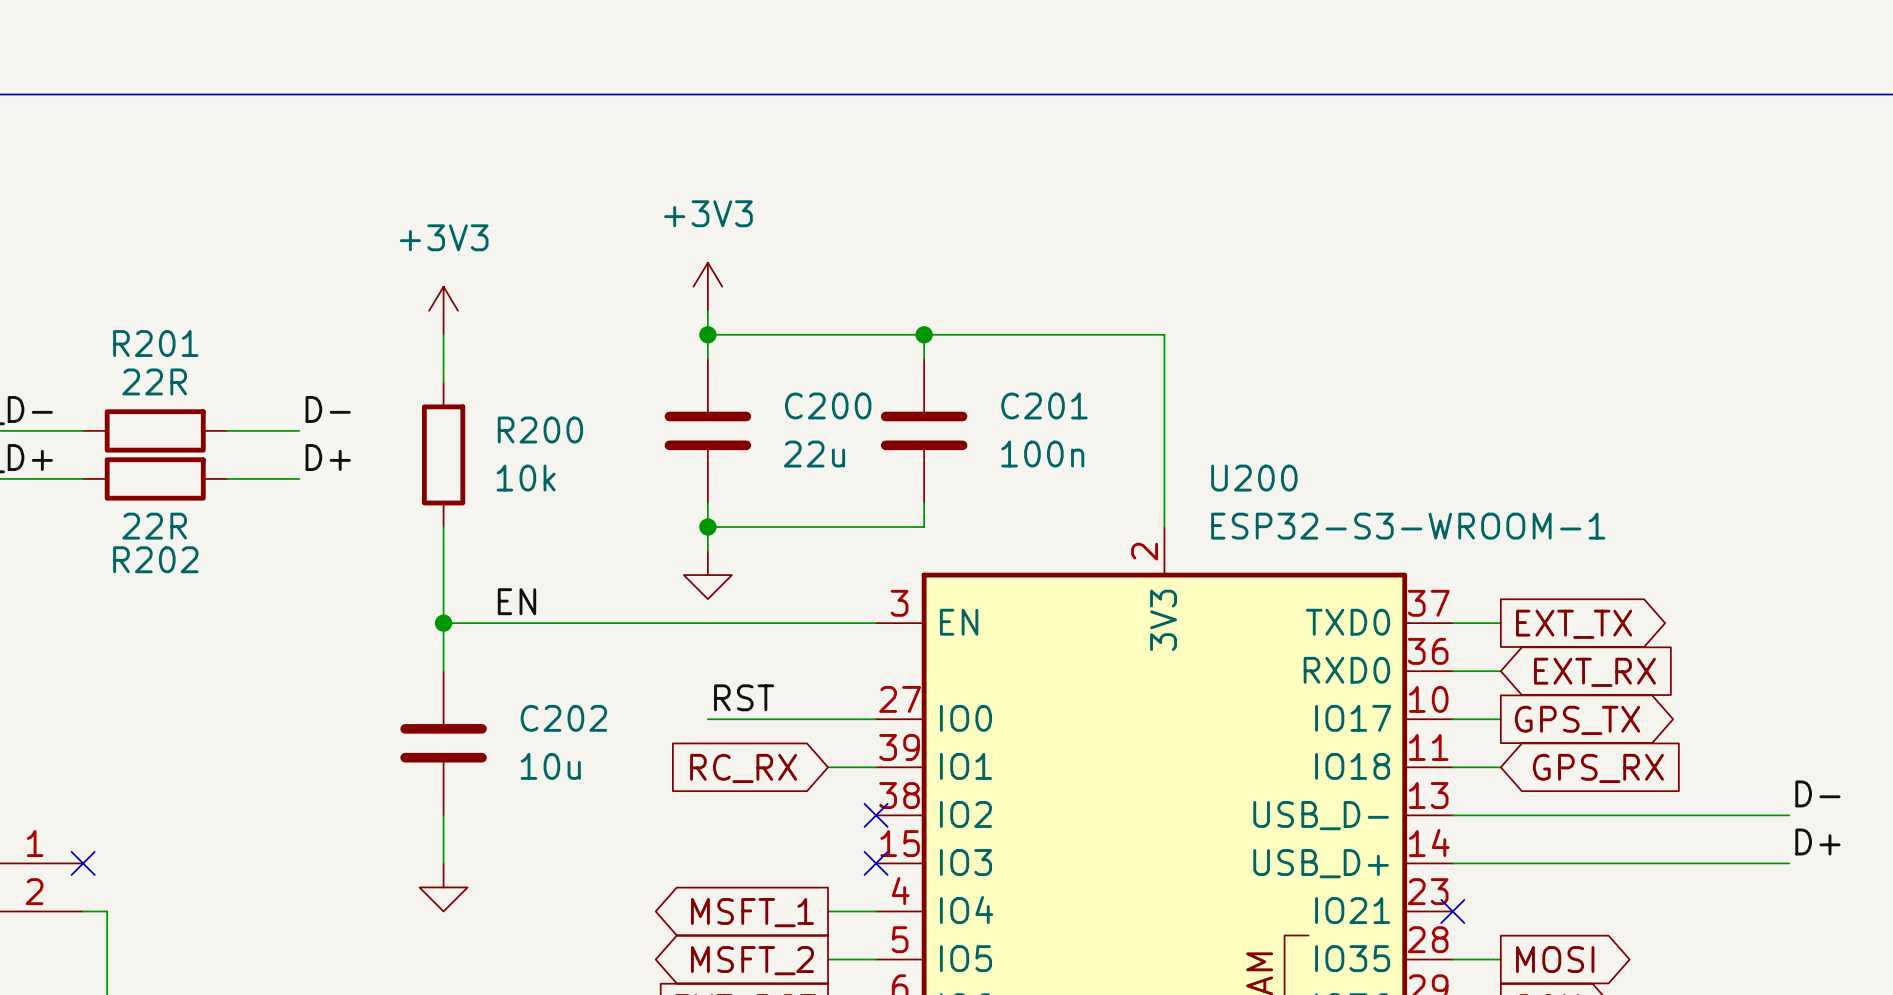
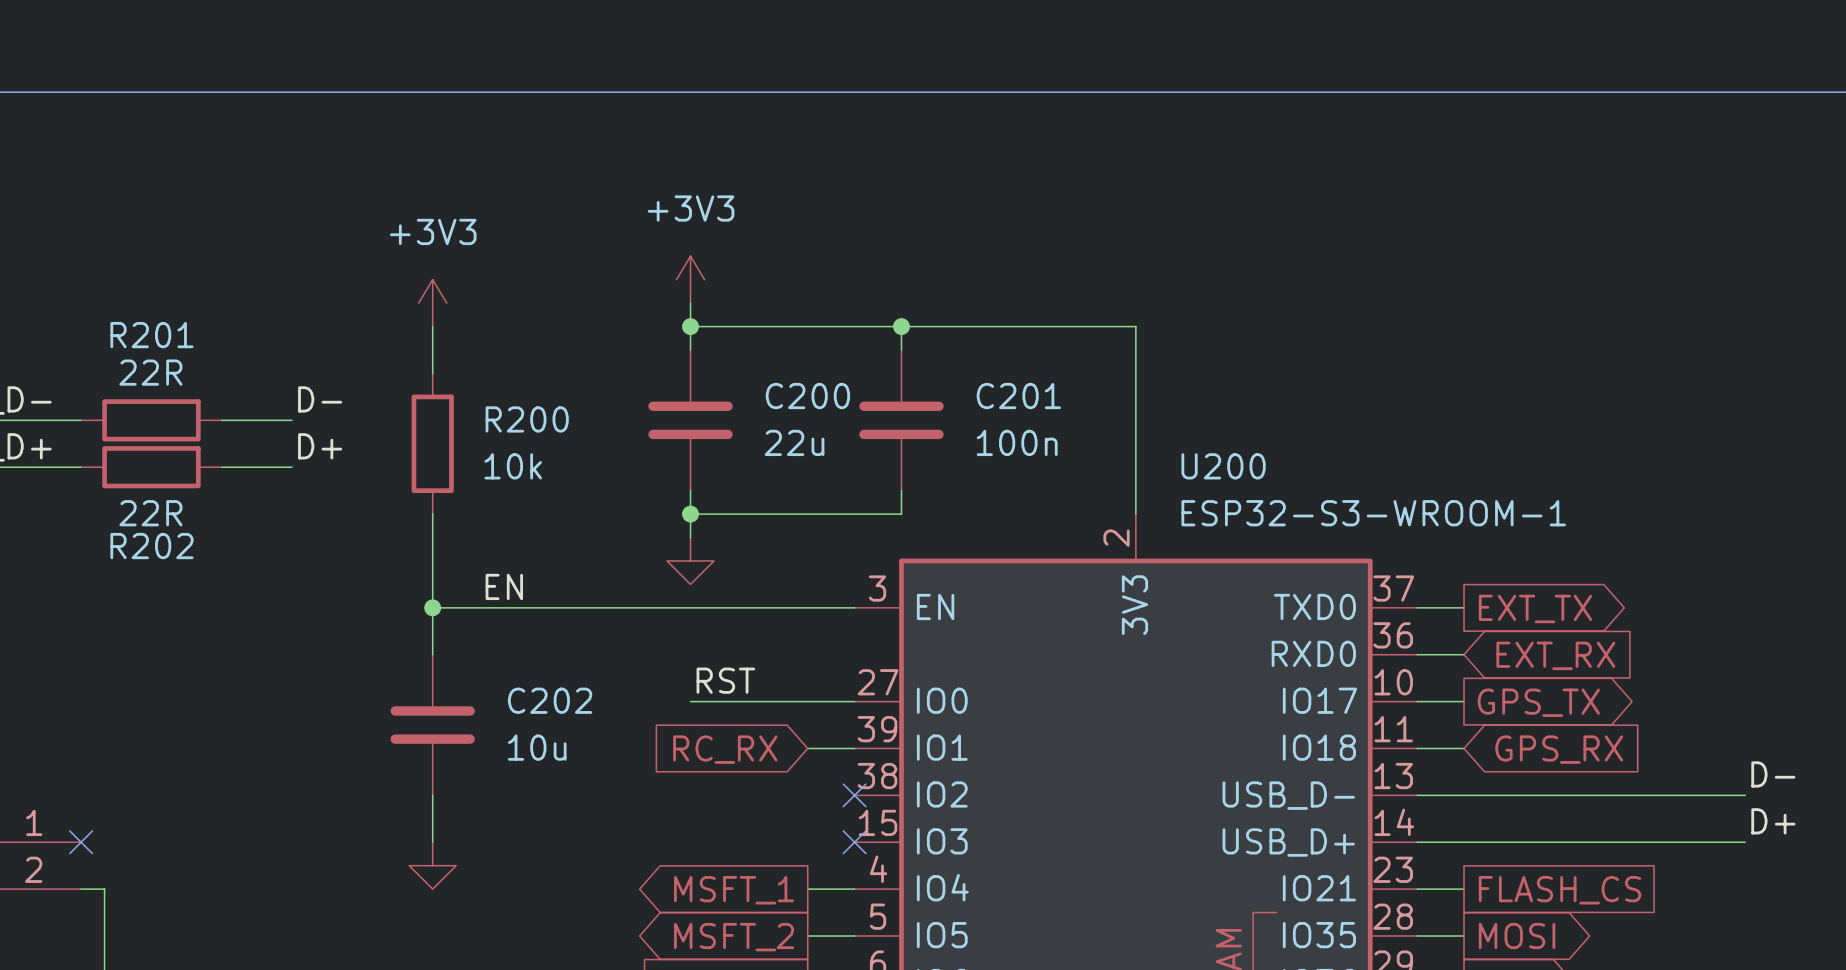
wire: none -> (1417, 889) (1464, 889)
no-connect mark: (1452, 911) -> none
global label: none -> FLASH_CS (1560, 890)

